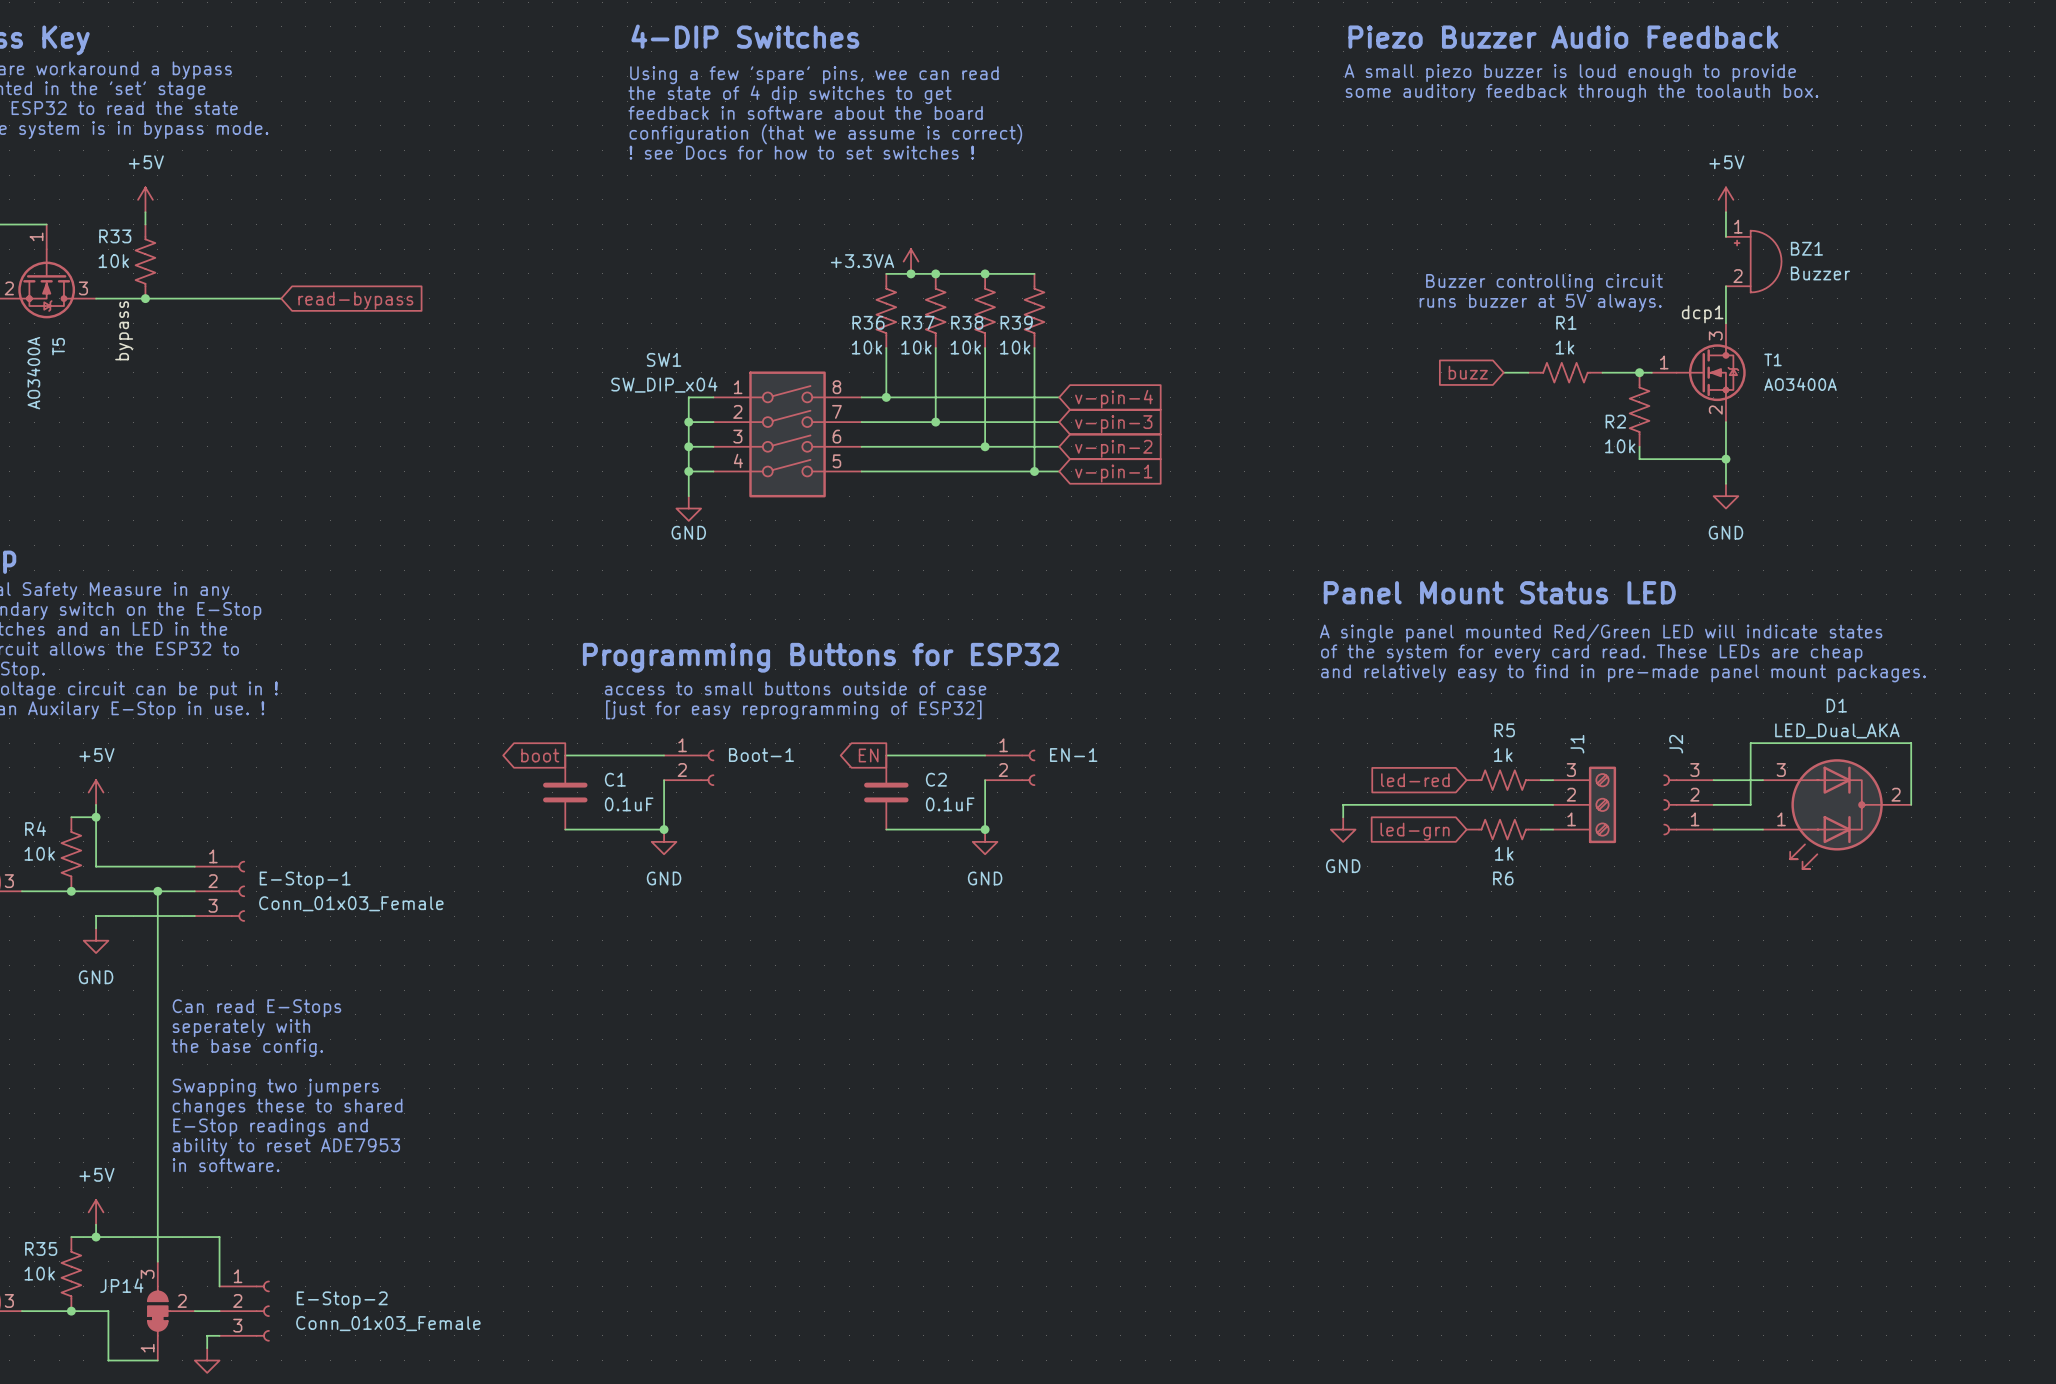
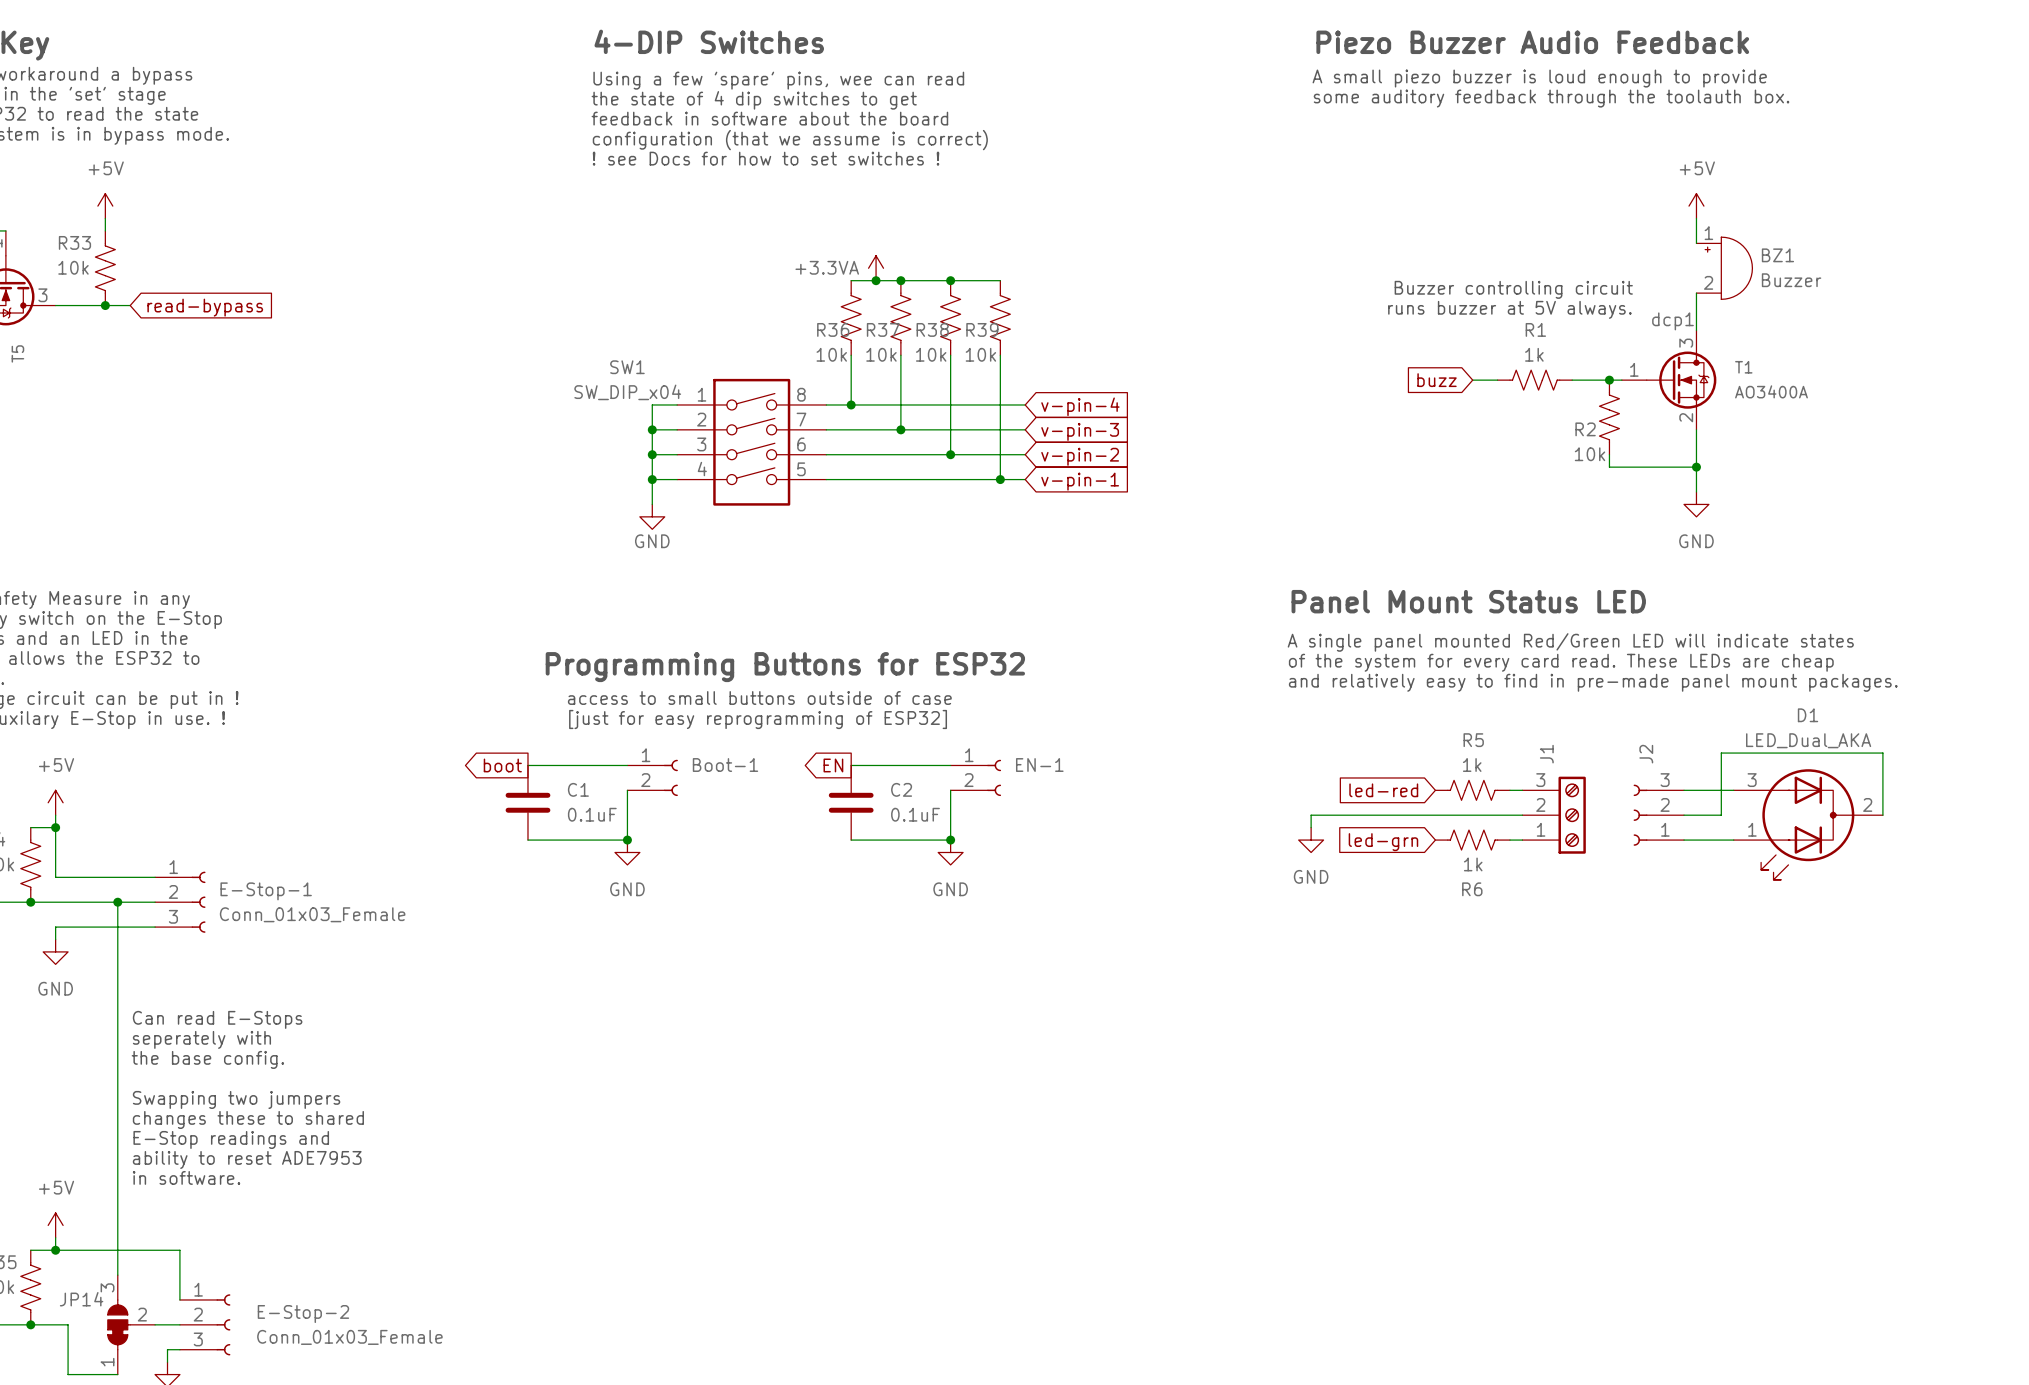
wire: (170, 298) (281, 298) -> none
global label position: read-bypass (355, 300) -> read-bypass (205, 307)
label: bypass (124, 330) -> none

